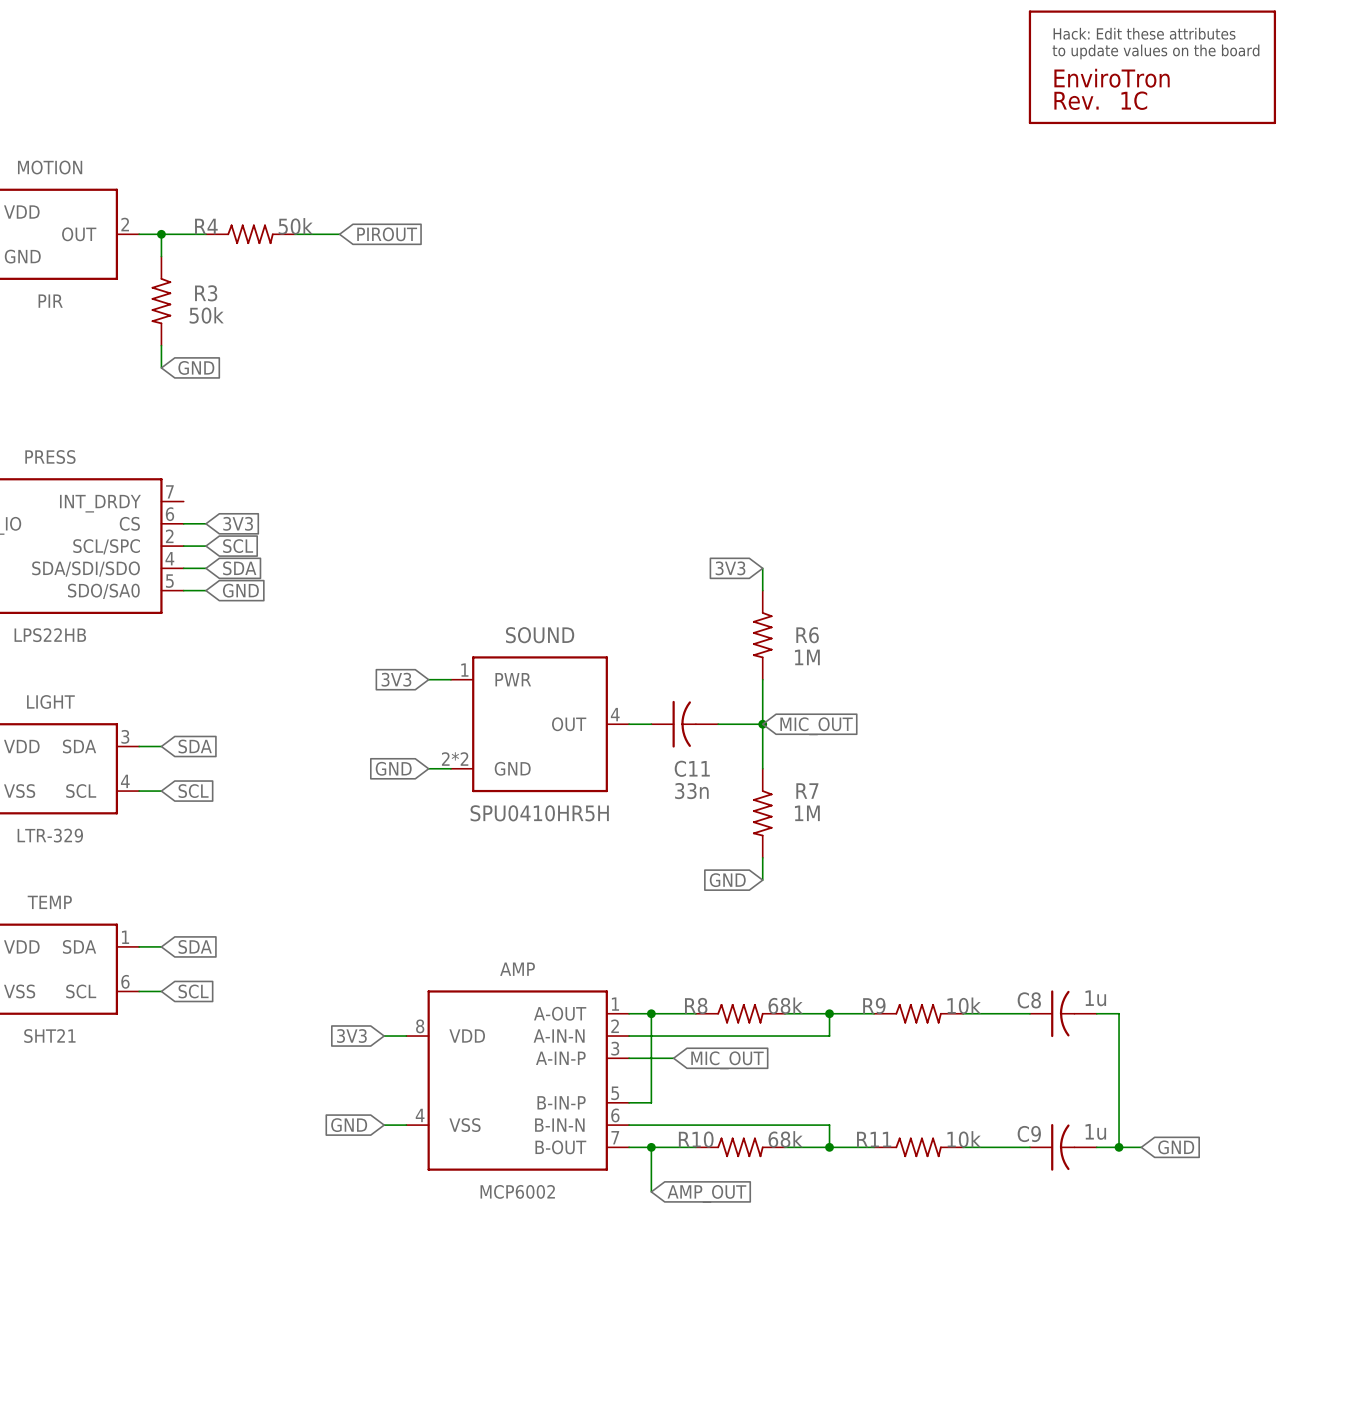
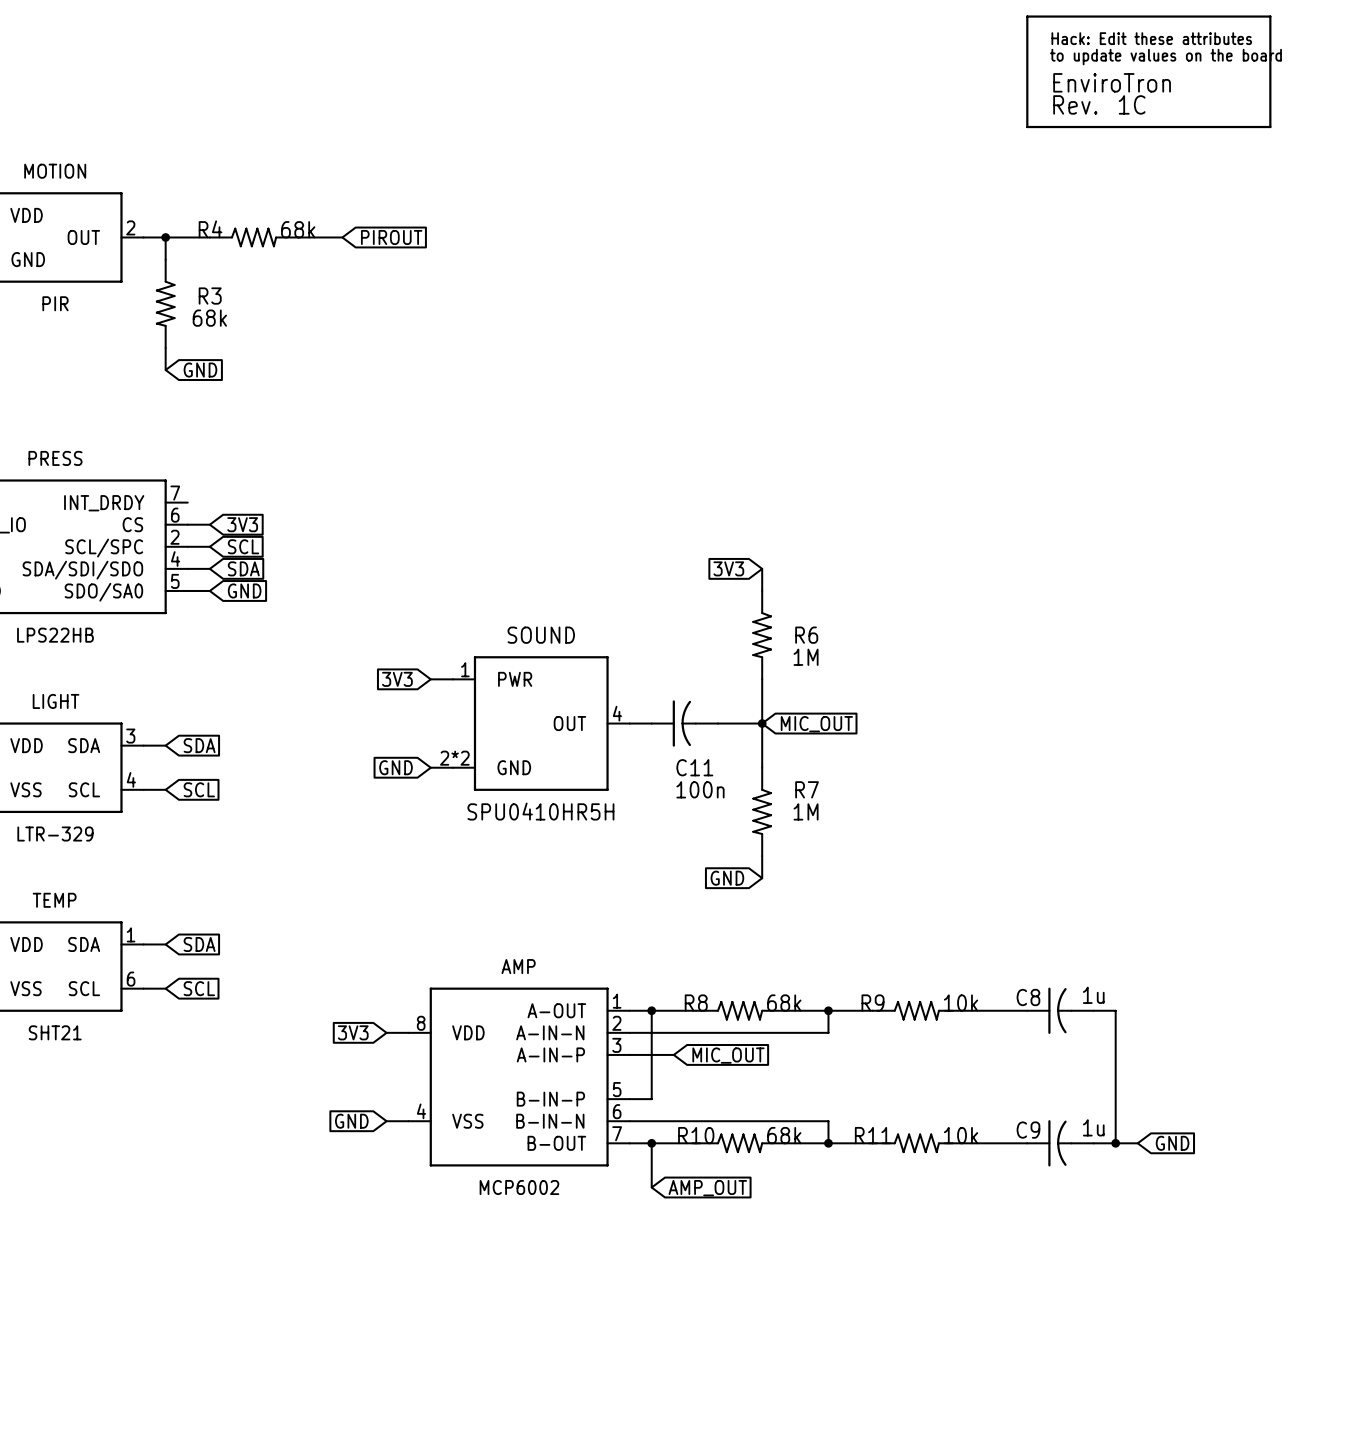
R4 value: 50k (295, 226) -> 68k (298, 229)
R3 value: 50k (206, 315) -> 68k (209, 318)
C11 value: 33n (691, 791) -> 100n (700, 789)

